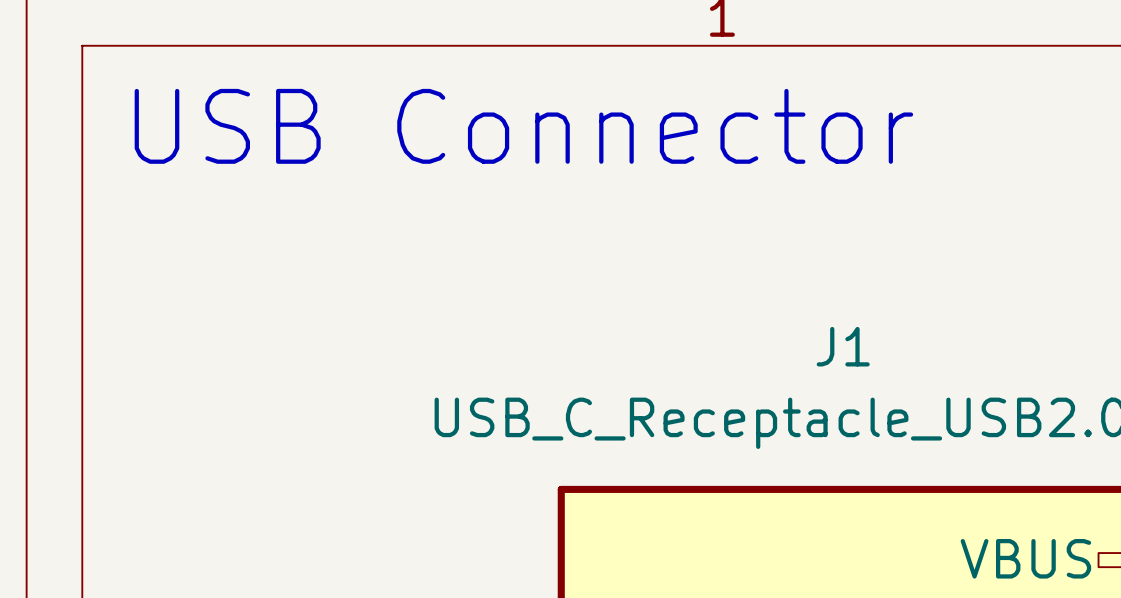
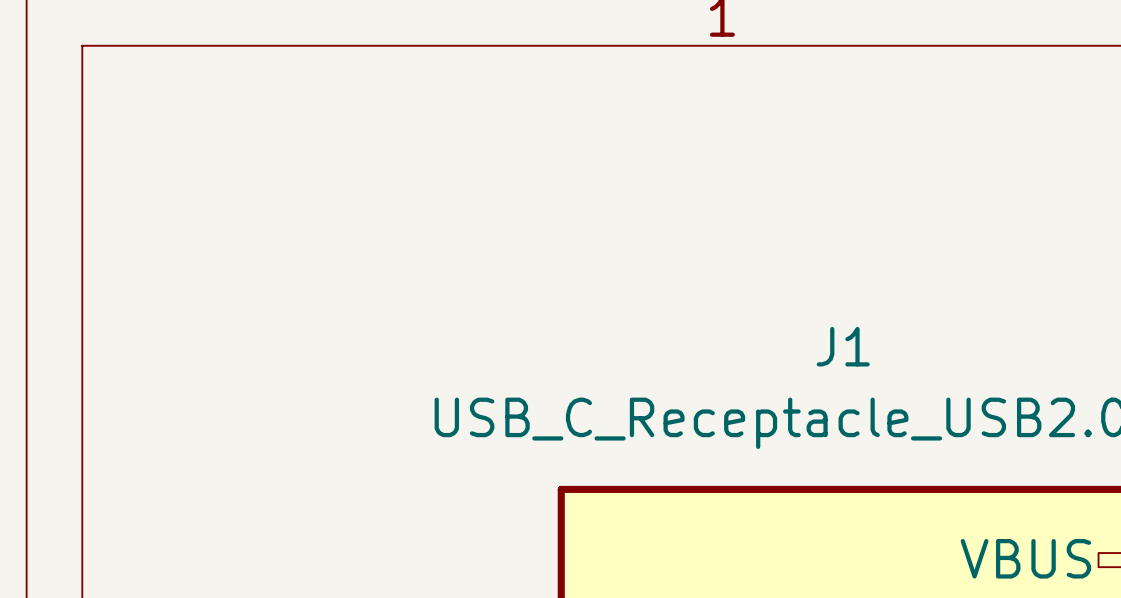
text: USB Connector (523, 126) -> none

